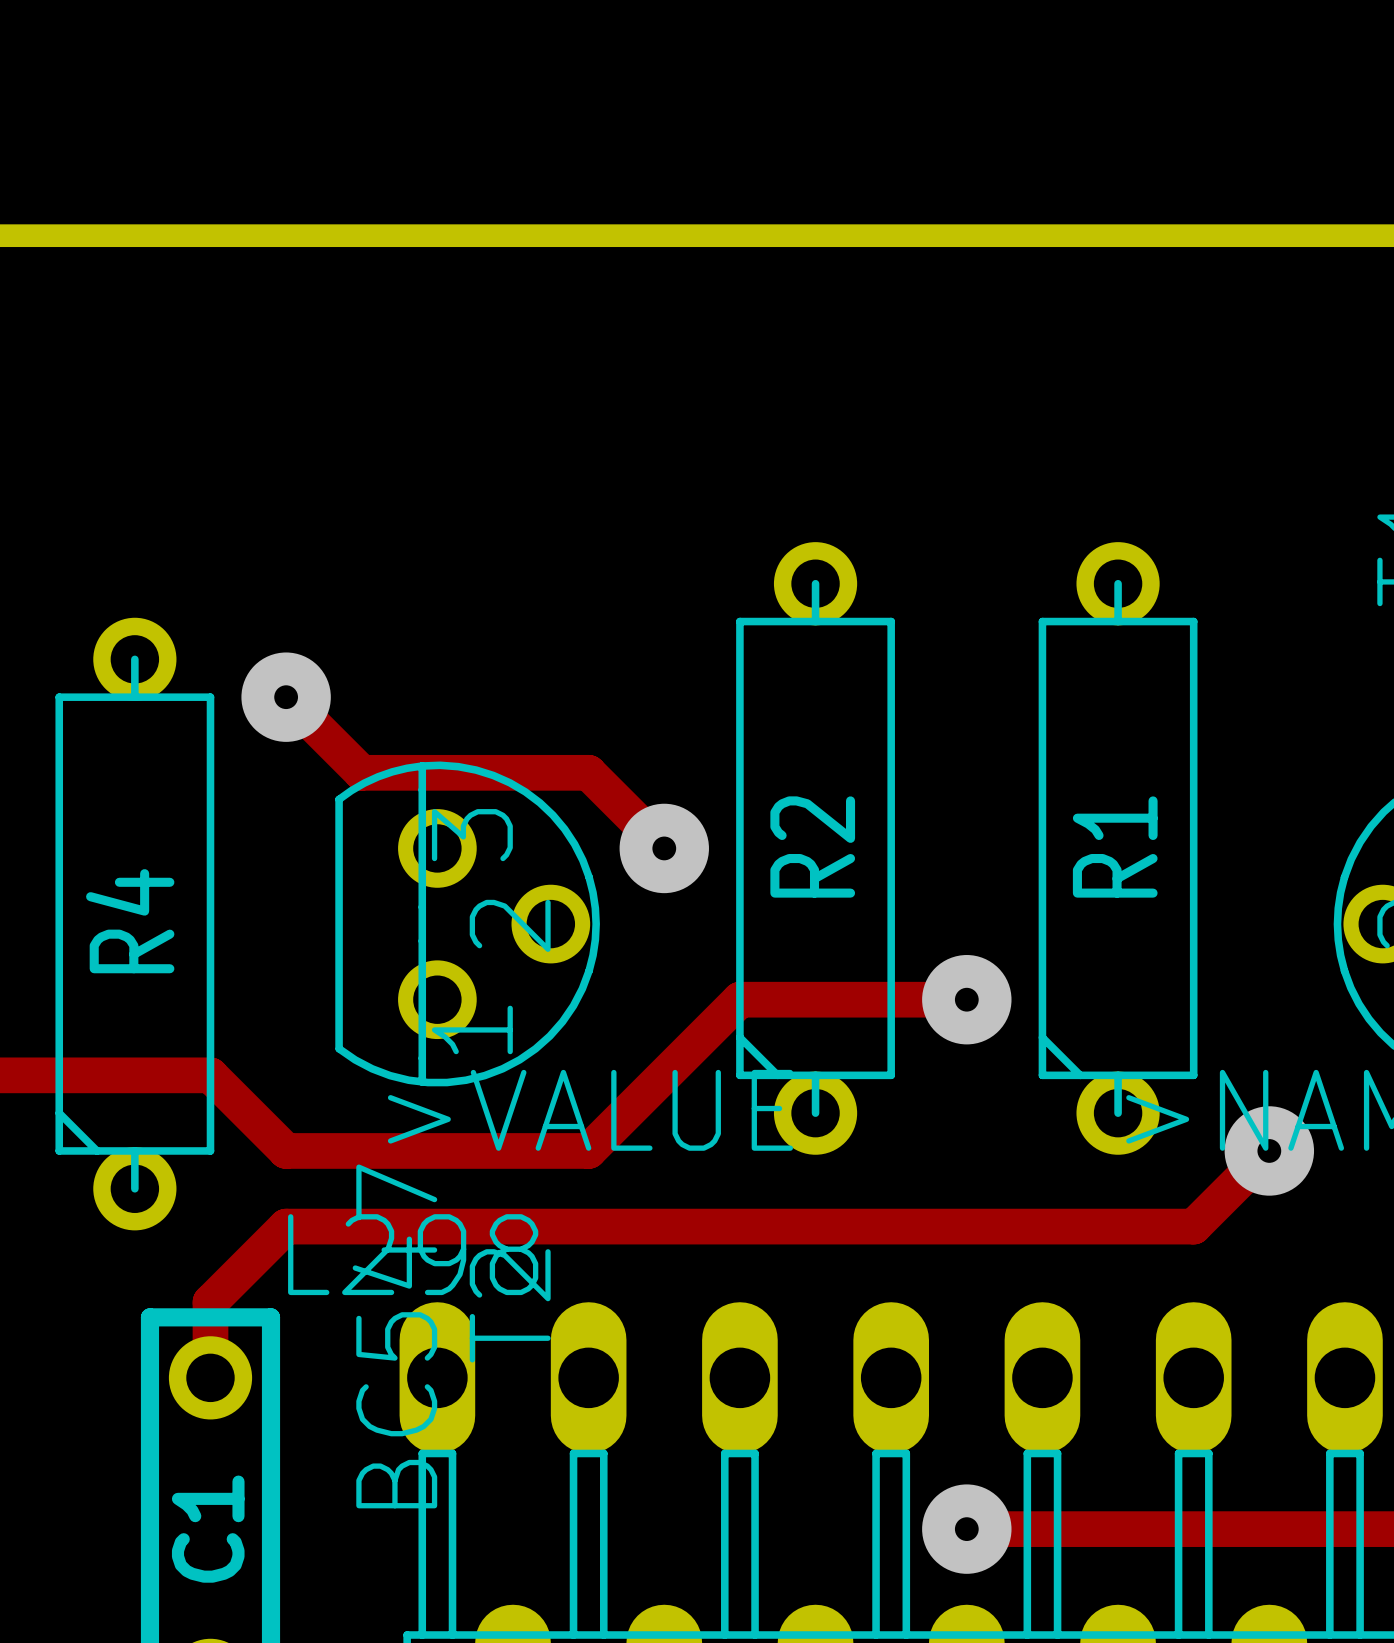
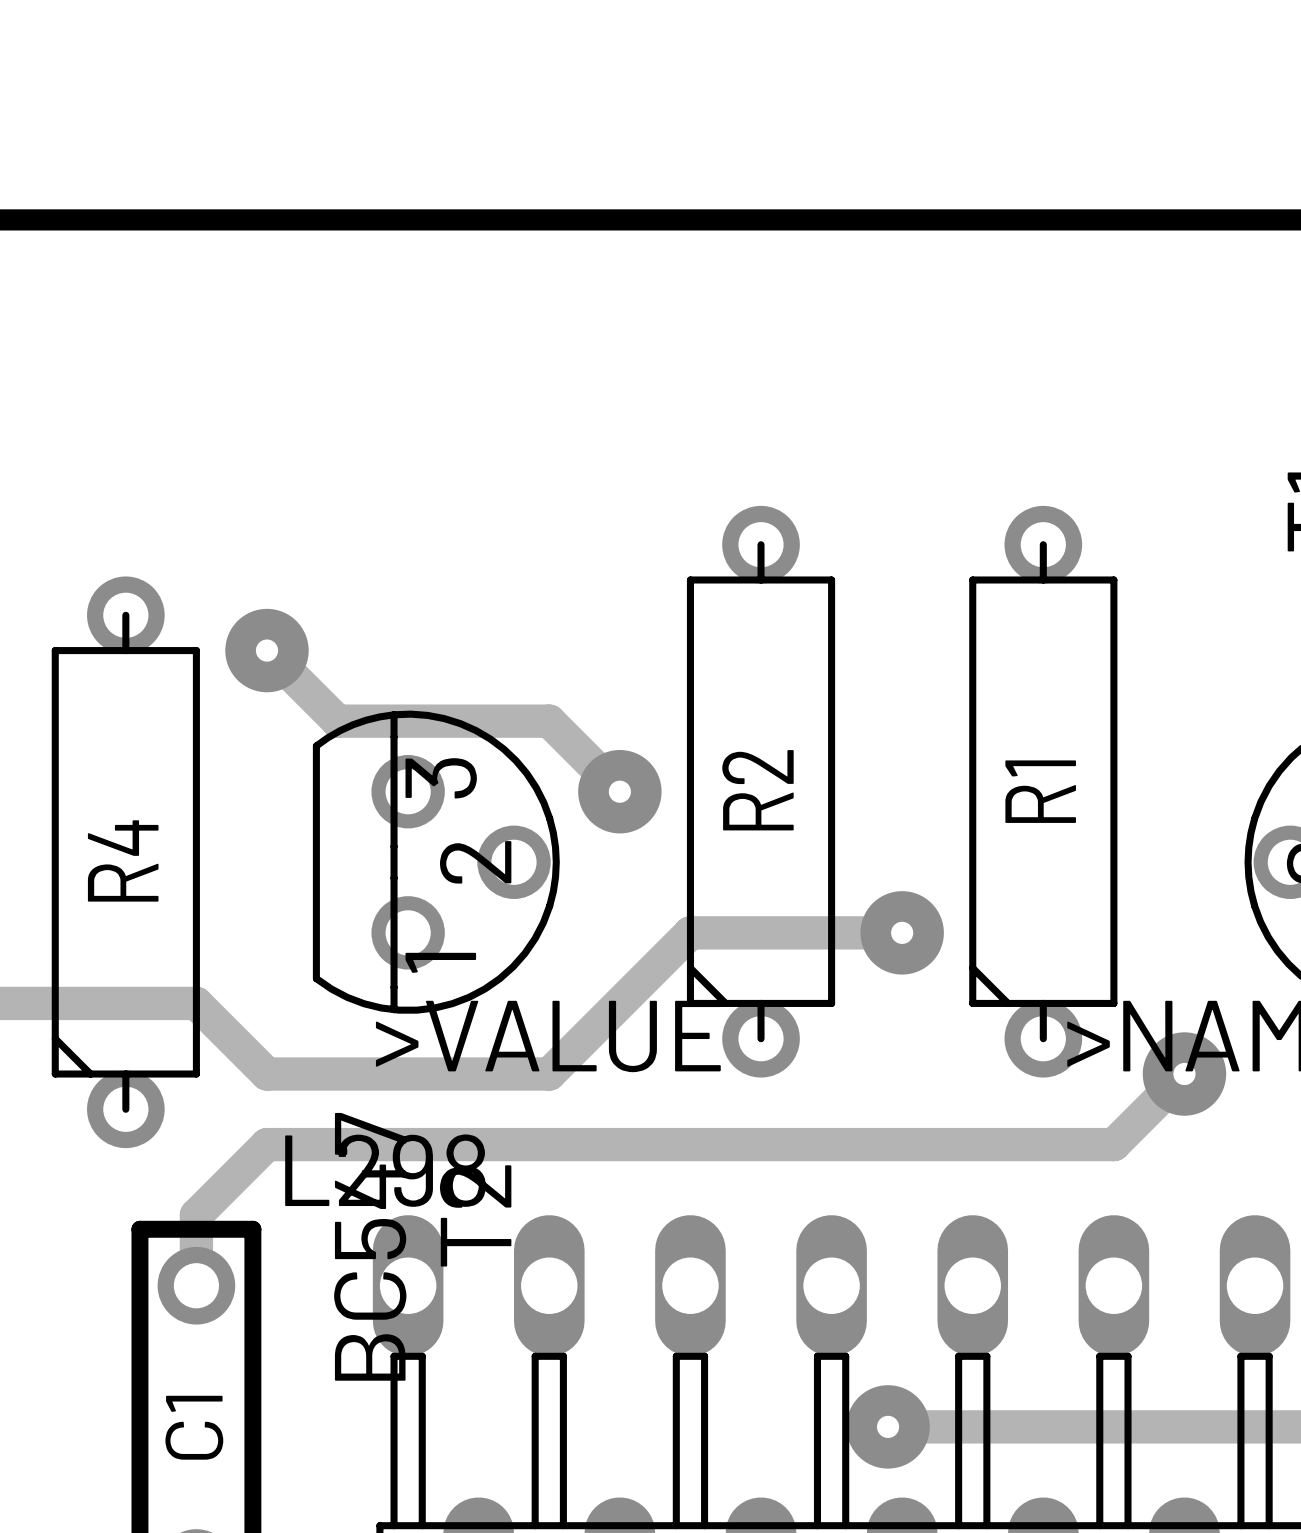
via position: (966, 1529) -> (888, 1426)

